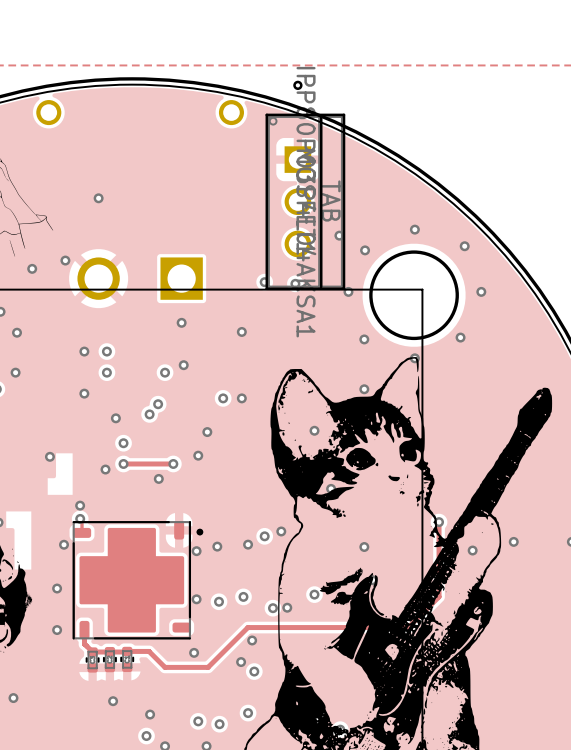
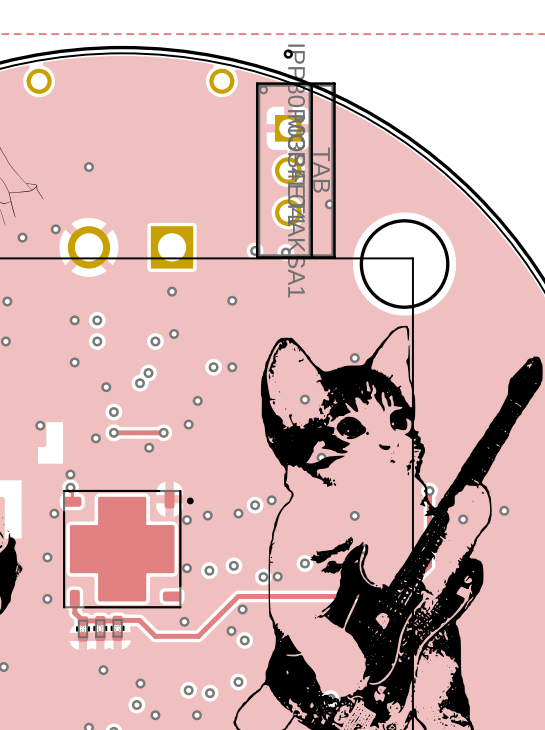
via: (414, 229) -> none
via: (464, 246) -> none
via: (365, 250) -> none
via: (348, 291) -> none
via: (481, 291) -> none
via: (460, 337) -> none
via: (364, 339) -> none
via: (414, 358) -> none

